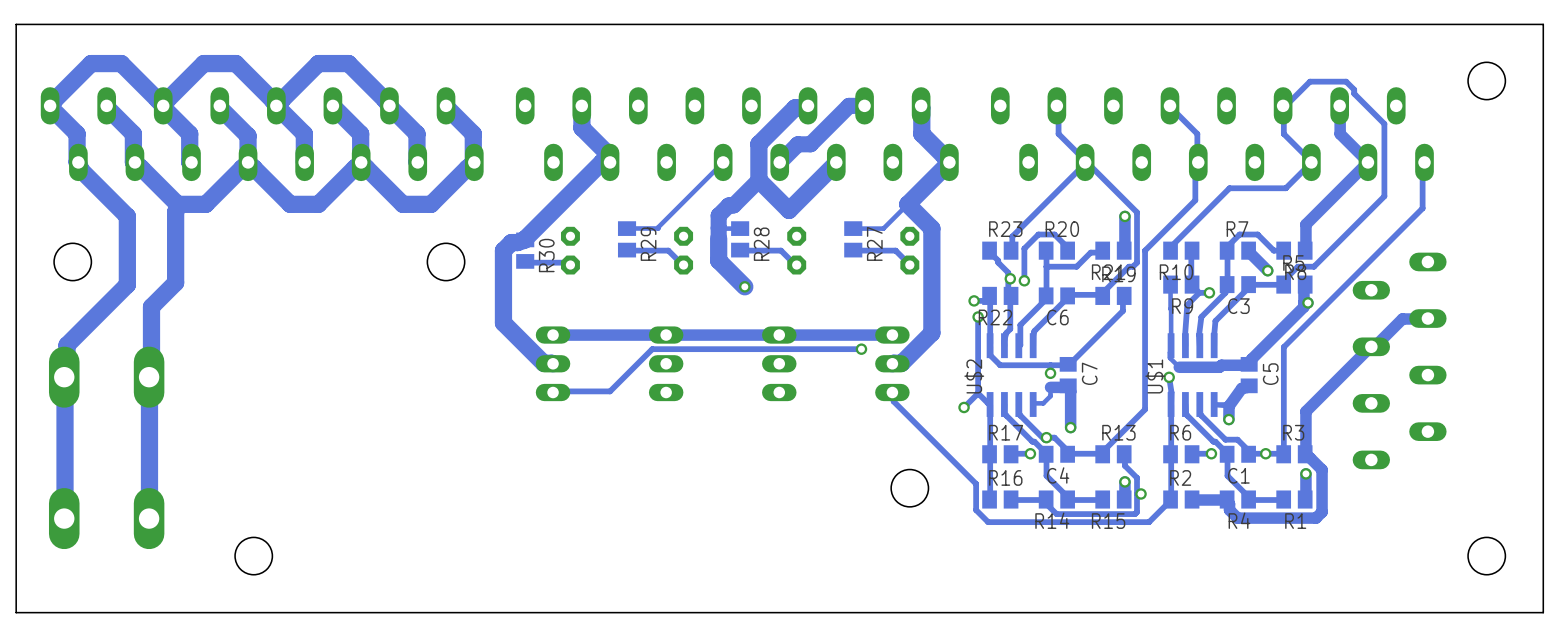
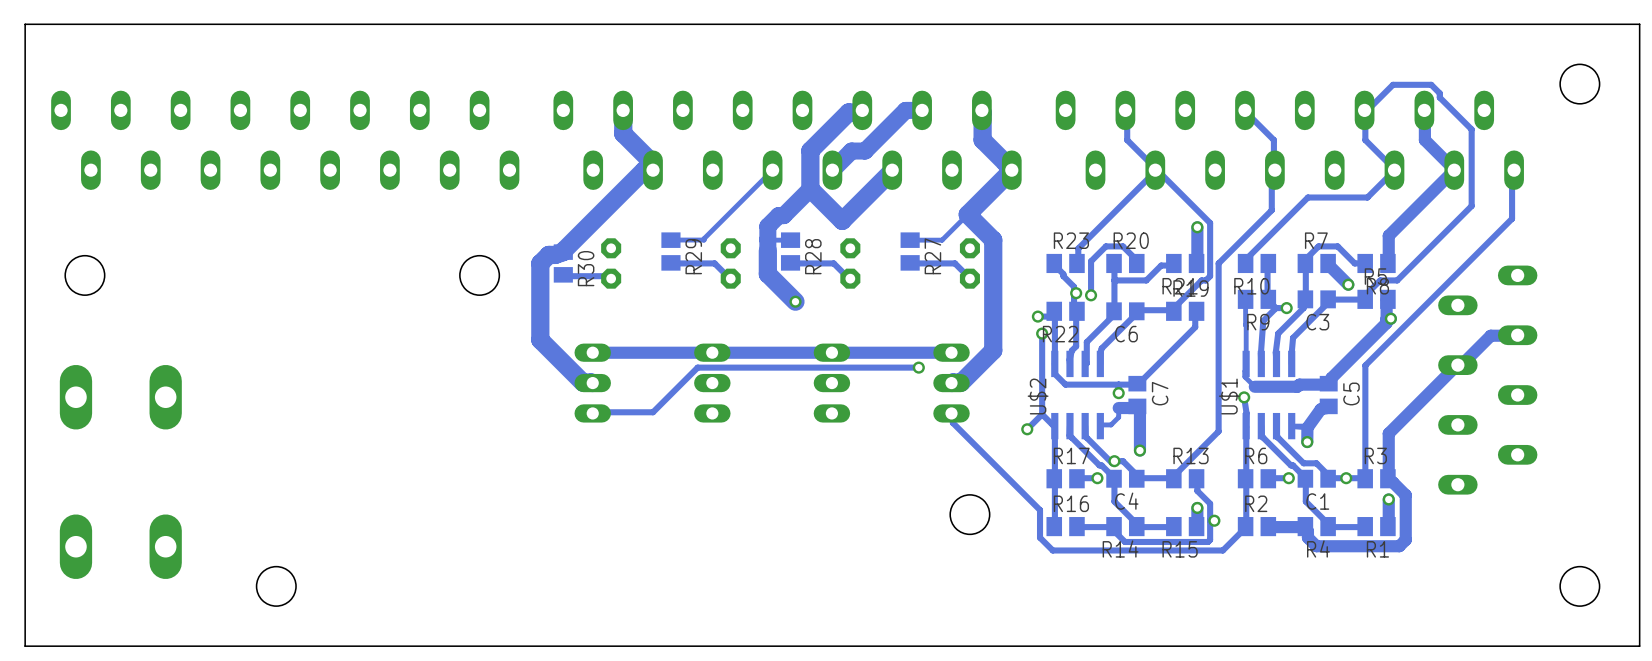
track: (106, 105) (133, 133) (133, 162) (177, 204) -> none
track: (163, 105) (189, 133) (189, 162) (191, 162) -> none
track: (163, 105) (121, 63) (91, 63) (50, 105) (77, 133) (77, 162) (81, 170) (127, 216) (127, 284) (67, 345) (67, 369) (64, 377) (64, 518) -> none
track: (219, 105) (248, 135) (248, 162) -> none
track: (276, 105) (304, 133) (304, 162) -> none
track: (276, 105) (318, 63) (348, 63) (416, 133) (417, 162) -> none
track: (276, 105) (235, 63) (203, 63) (163, 105) -> none
track: (332, 105) (360, 133) (361, 162) -> none
track: (446, 105) (473, 133) (474, 162) (431, 204) (402, 204) (361, 162) -> none
track: (248, 162) (205, 204) (177, 204) -> none
track: (361, 162) (318, 204) (290, 204) (248, 162) -> none
track: (177, 204) (175, 212) (175, 282) (151, 306) (151, 369) (149, 377) (149, 518) -> none

